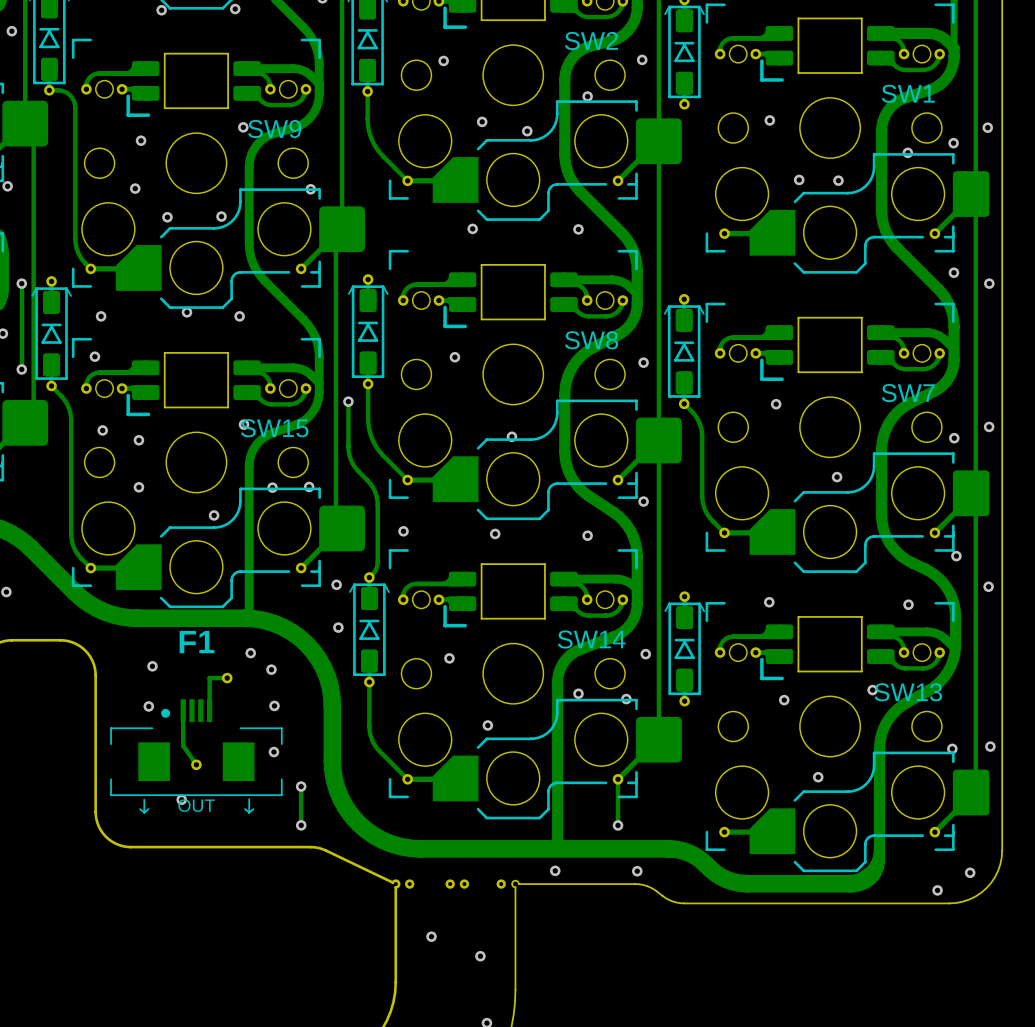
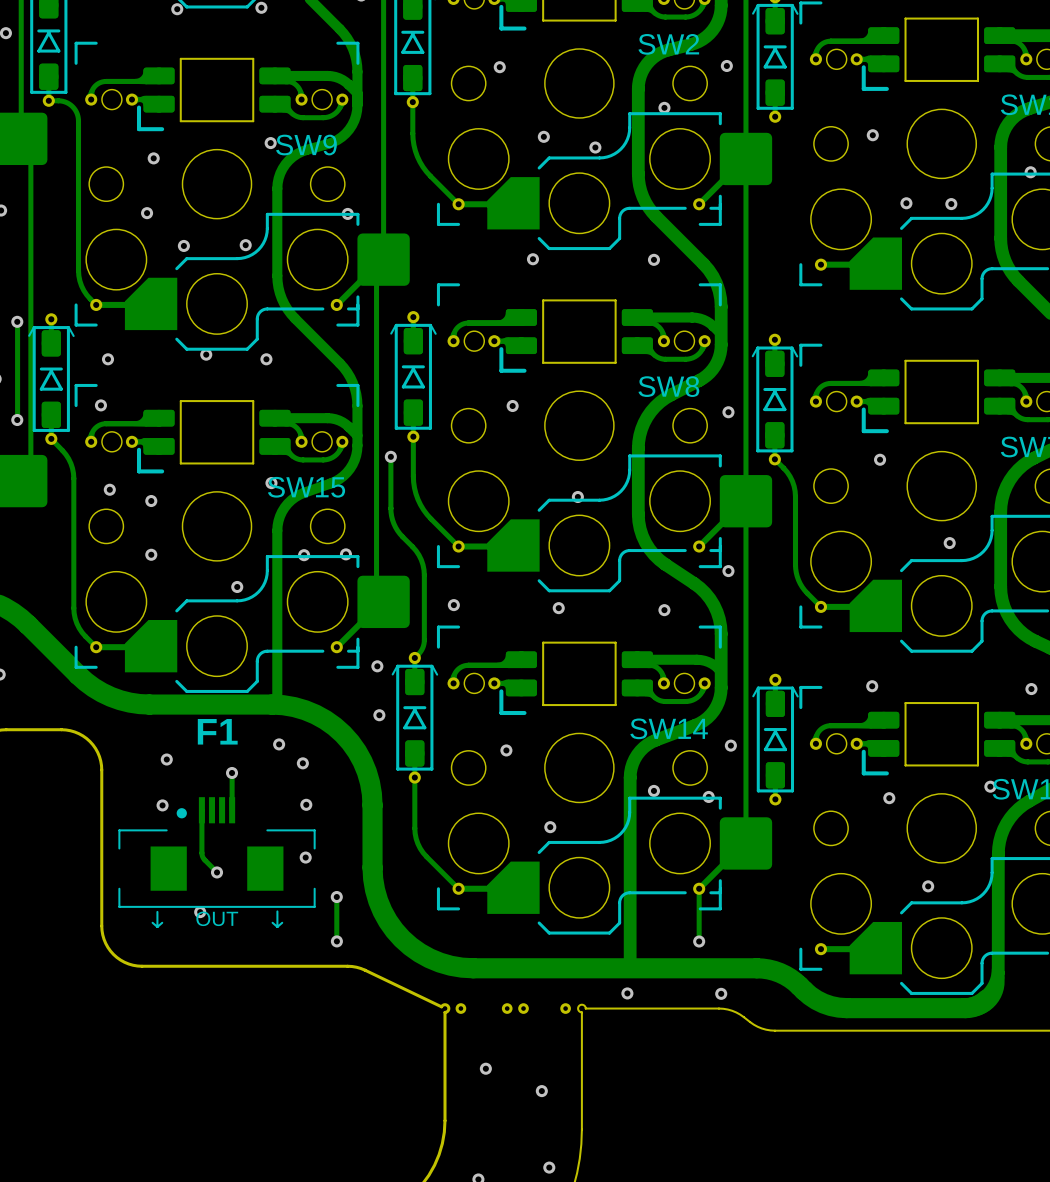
F1 footprint: [110, 672, 283, 814] -> [118, 797, 316, 929]
track: none -> (232, 773) (232, 810)
via: none -> (232, 772)
track: none -> (201, 810) (202, 854) (216, 872)
via: none -> (217, 872)

